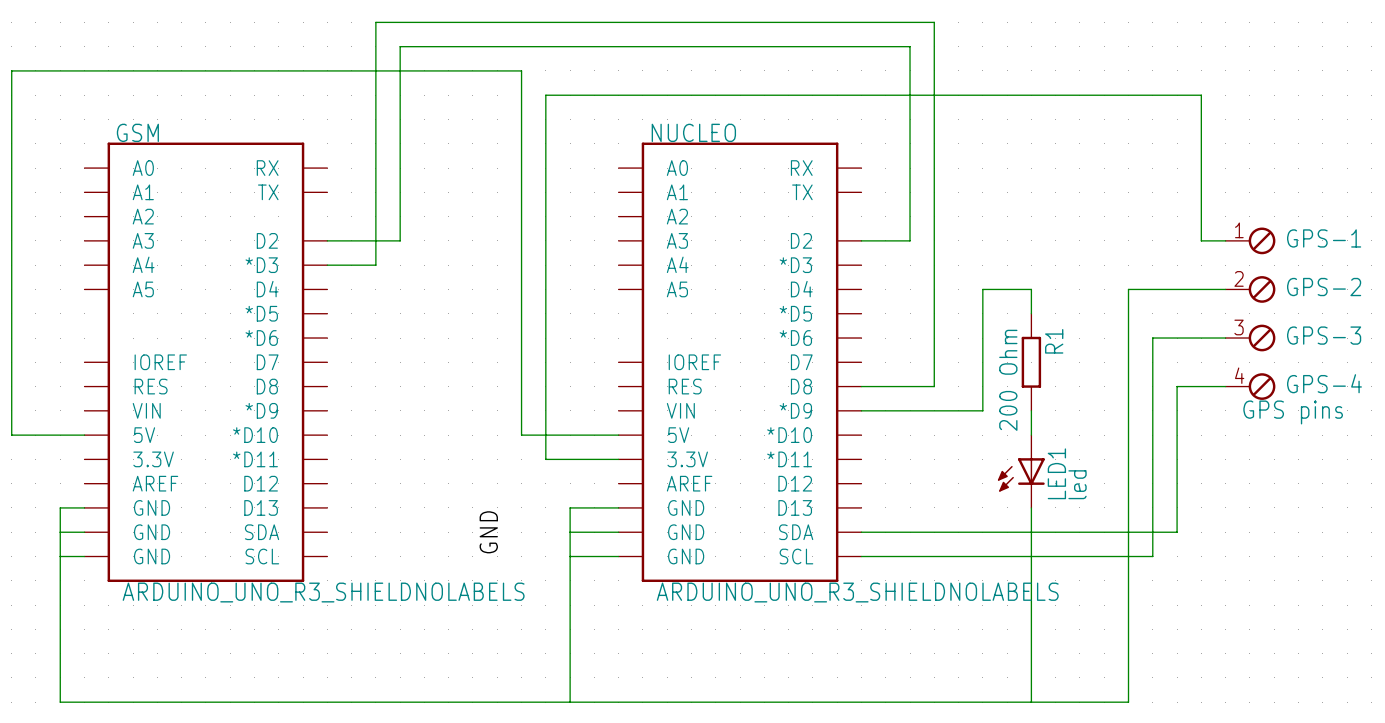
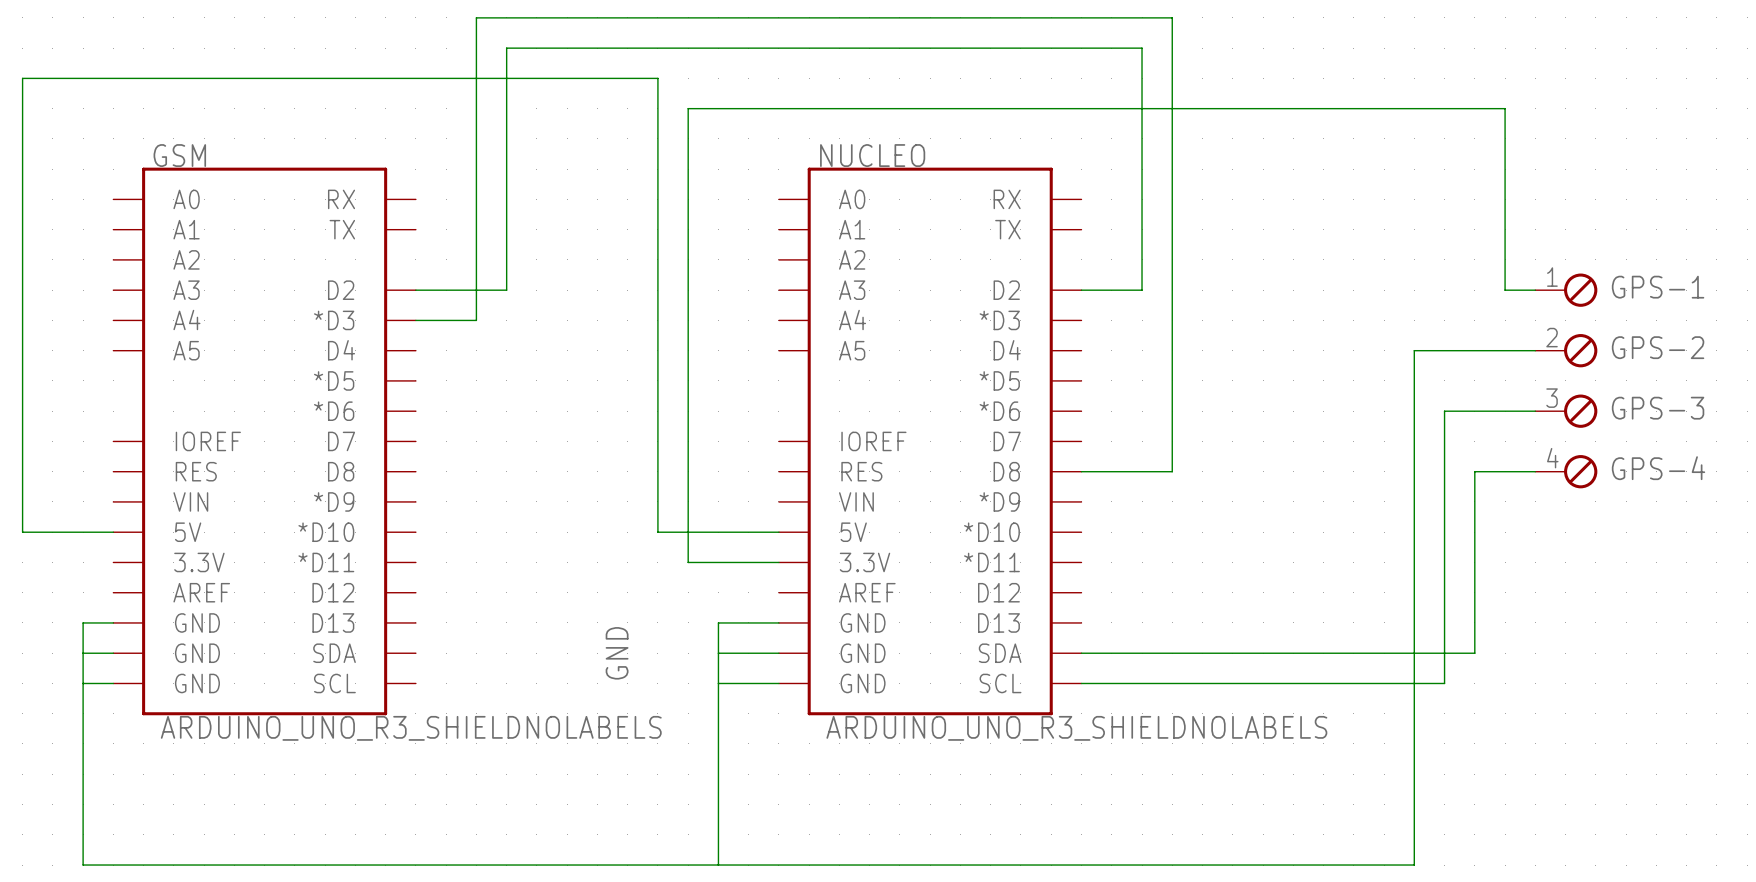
wire: (1031, 313) (1031, 289) (982, 289) (982, 410) (861, 410) -> none
R1: 200 Ohm (1031, 362) -> none
wire: (1031, 410) (1031, 435) -> none
GPS-4 value: GPS pins (1293, 412) -> none
LED1: led (1021, 471) -> none
wire: (1031, 507) (1031, 702) -> none

